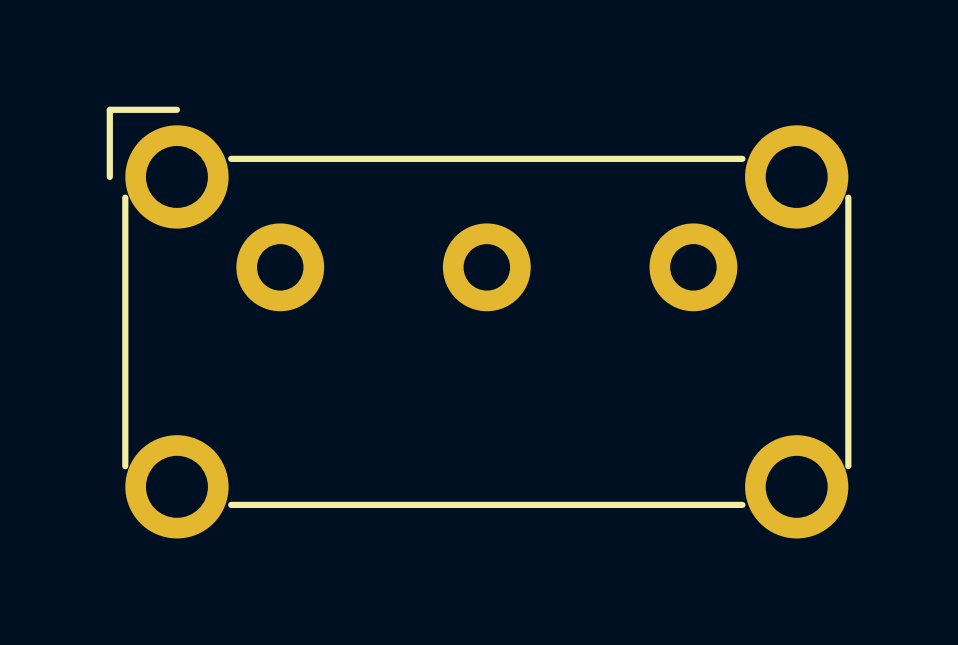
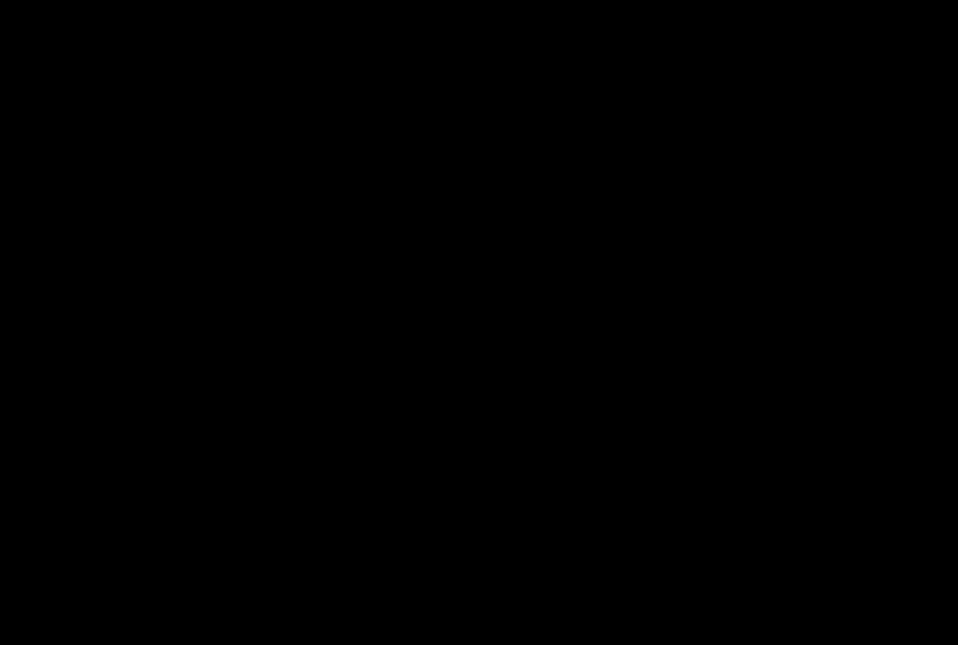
part: (479, 322) -> none

